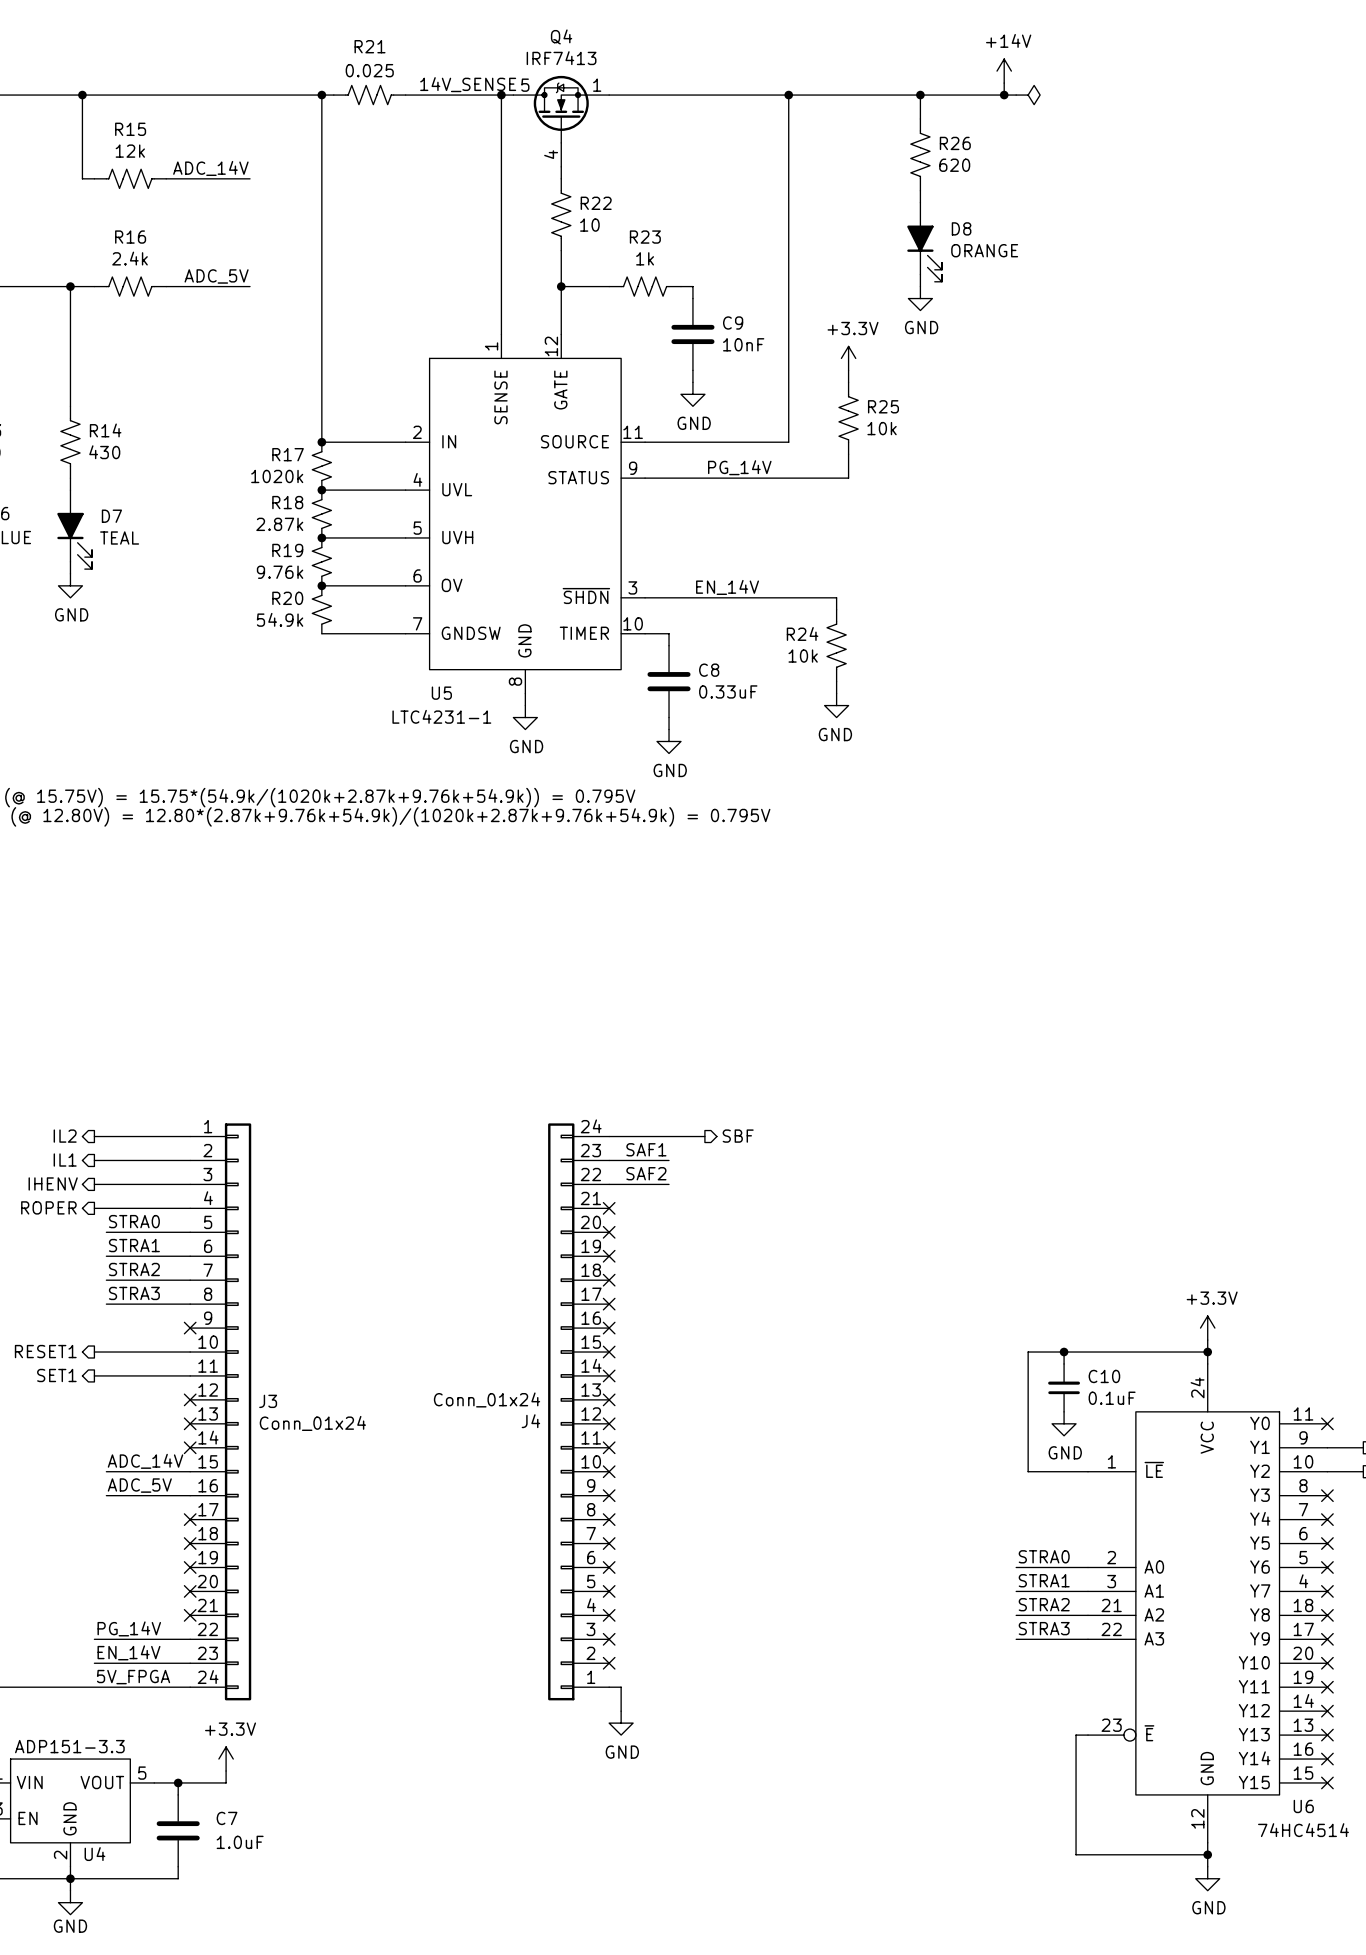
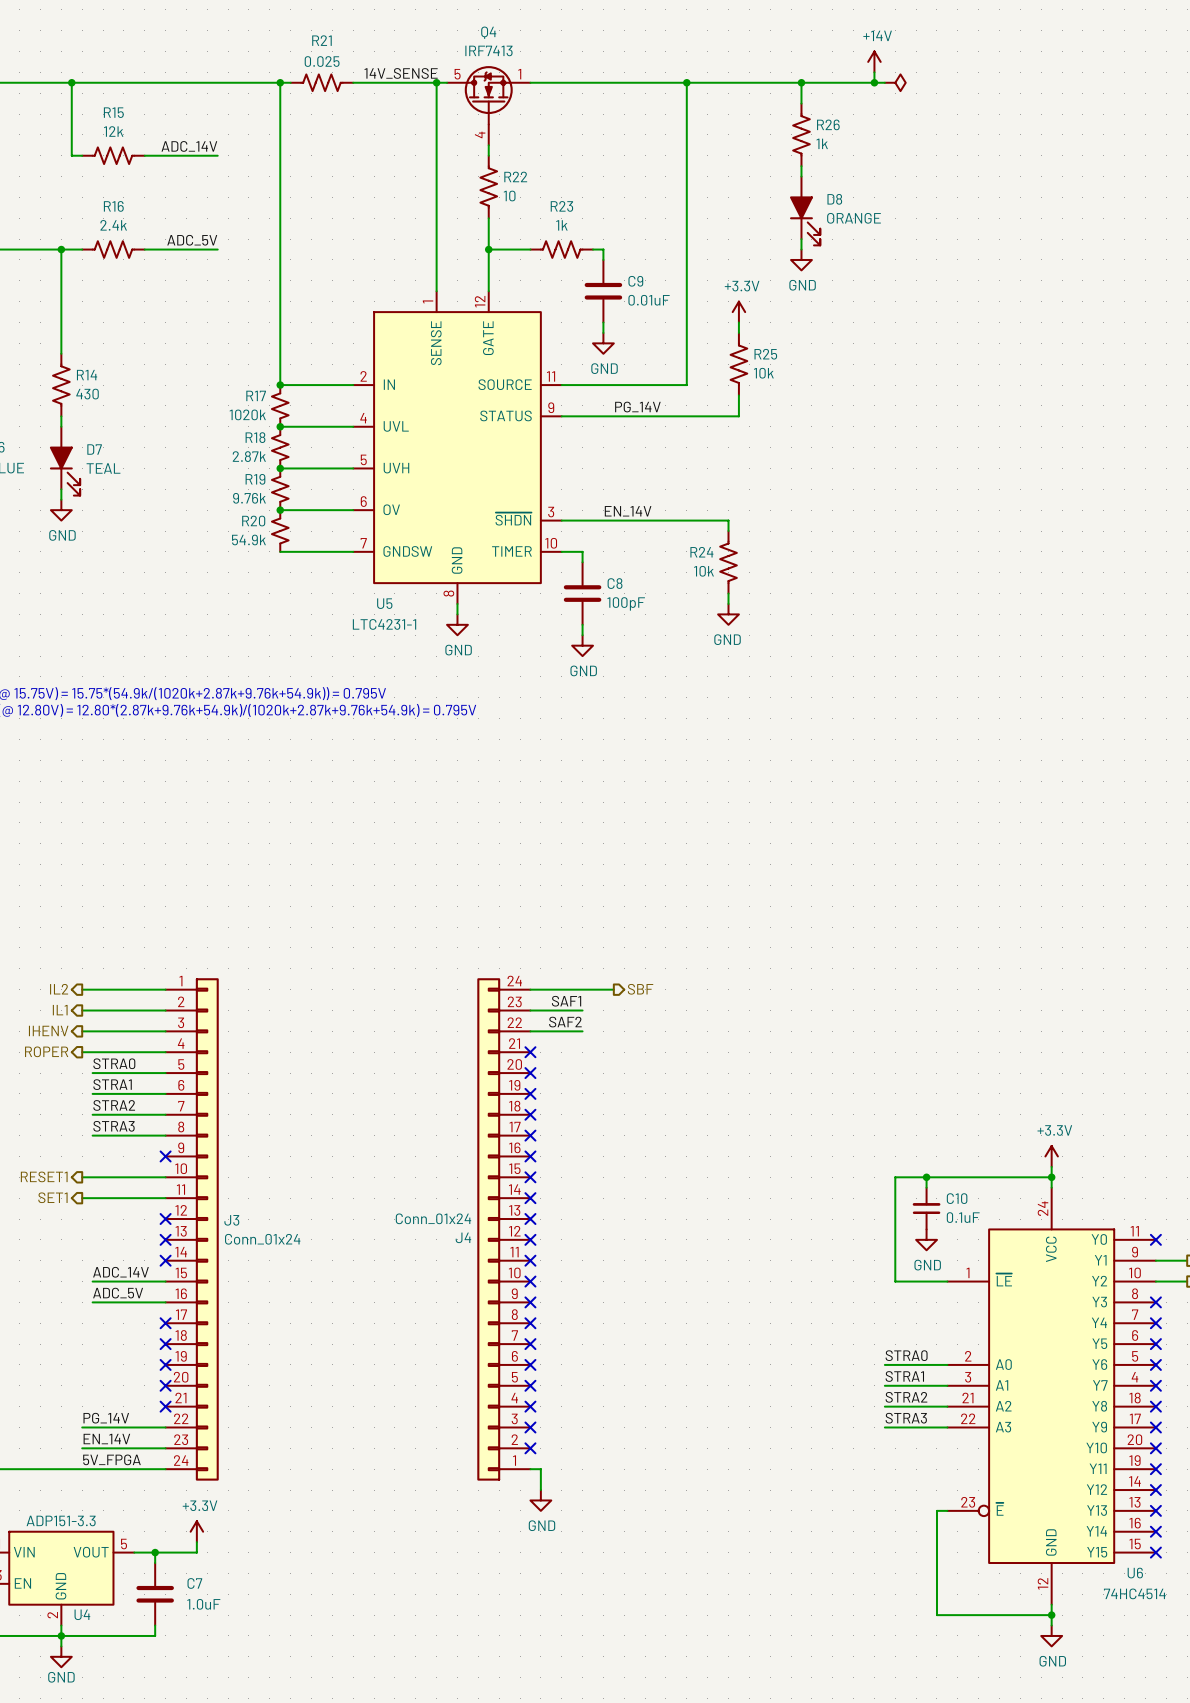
R26 value: 620 (954, 165) -> 1k (822, 143)
C9 value: 10nF (743, 344) -> 0.01uF (649, 300)
C8 value: 0.33uF (728, 691) -> 100pF (626, 603)

